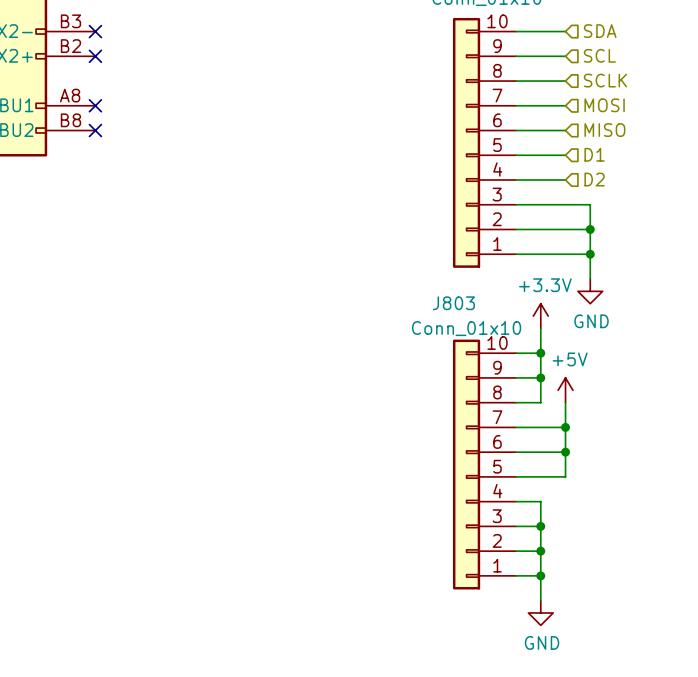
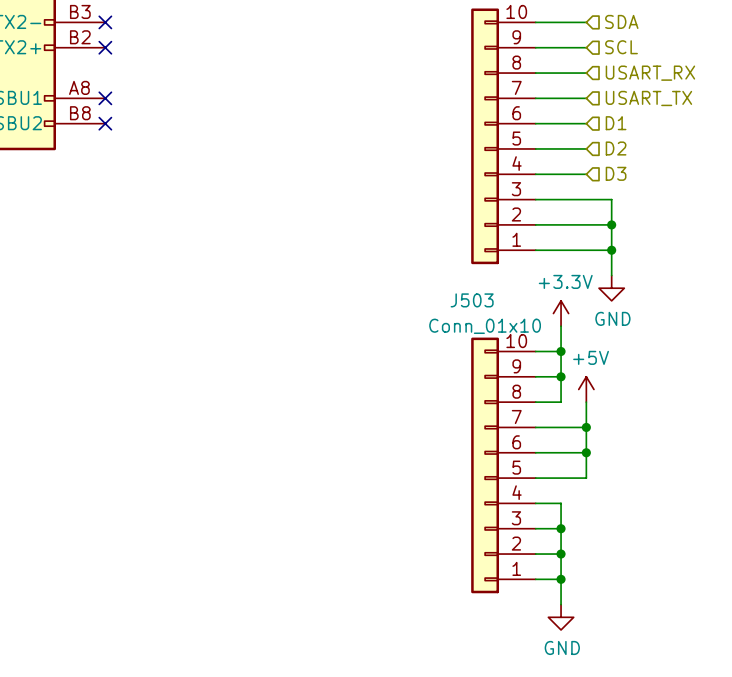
hierarchical label: SCLK (605, 80) -> USART_RX (650, 73)
hierarchical label: MOSI (604, 105) -> USART_TX (648, 98)
hierarchical label: MISO (604, 130) -> D1 (616, 123)
hierarchical label: D1 (594, 154) -> D2 (616, 148)
hierarchical label: D2 (594, 179) -> D3 (616, 173)
J803 name: J803 (453, 303) -> J503 (472, 300)

